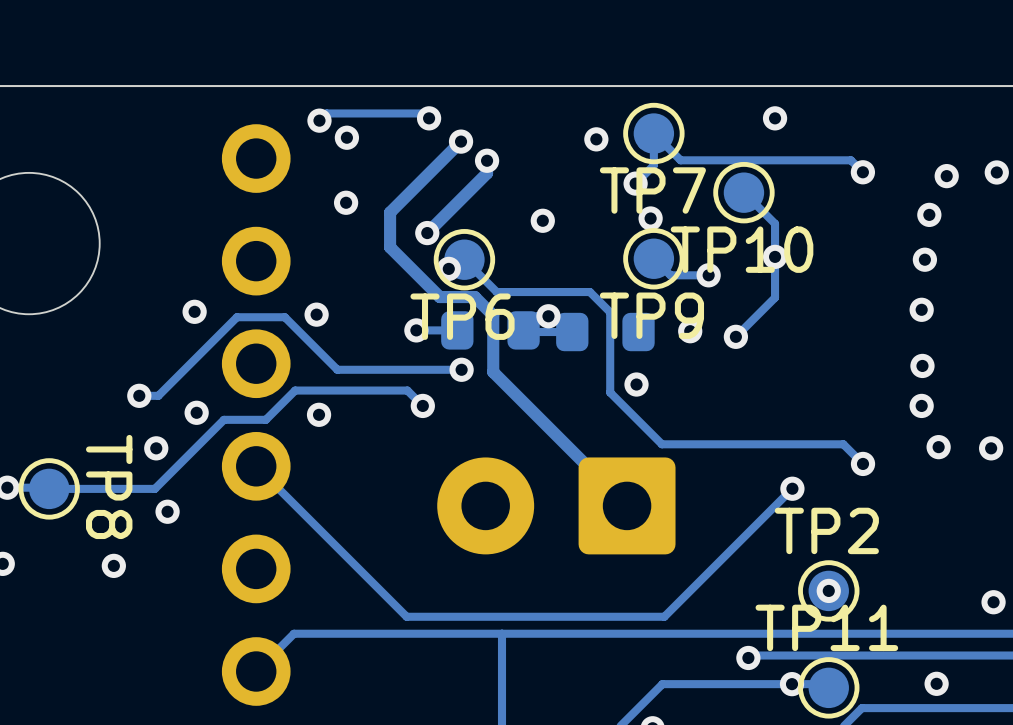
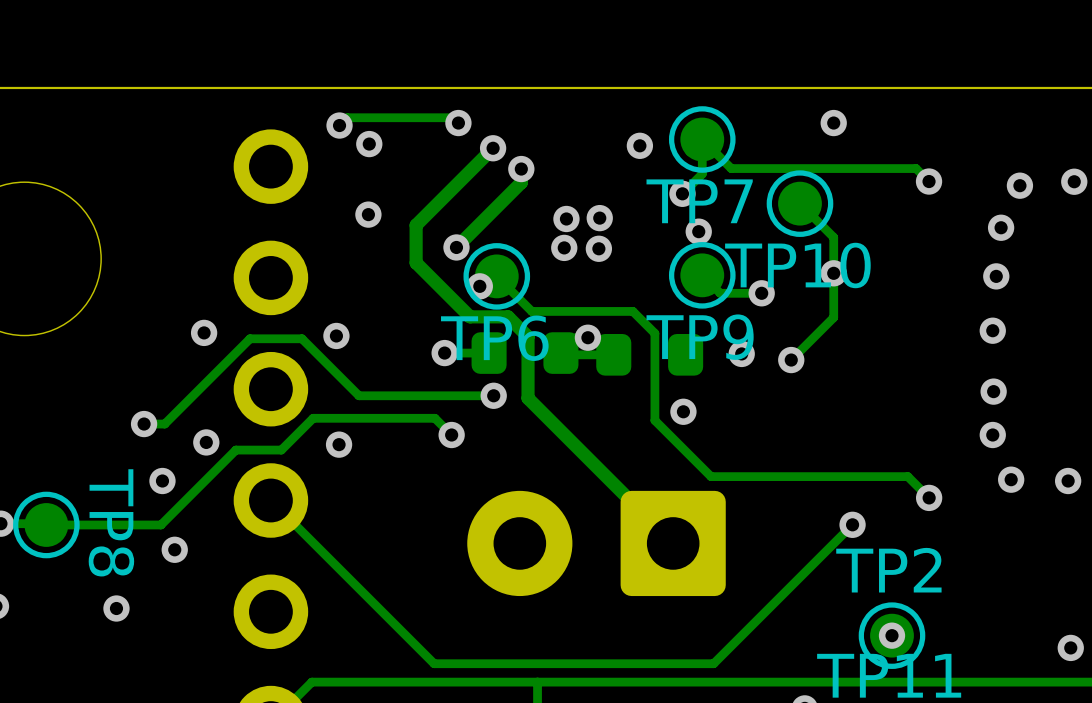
via: none -> (566, 218)
via: none -> (599, 218)
via: (542, 220) -> none
via: none -> (564, 247)
via: none -> (598, 248)

